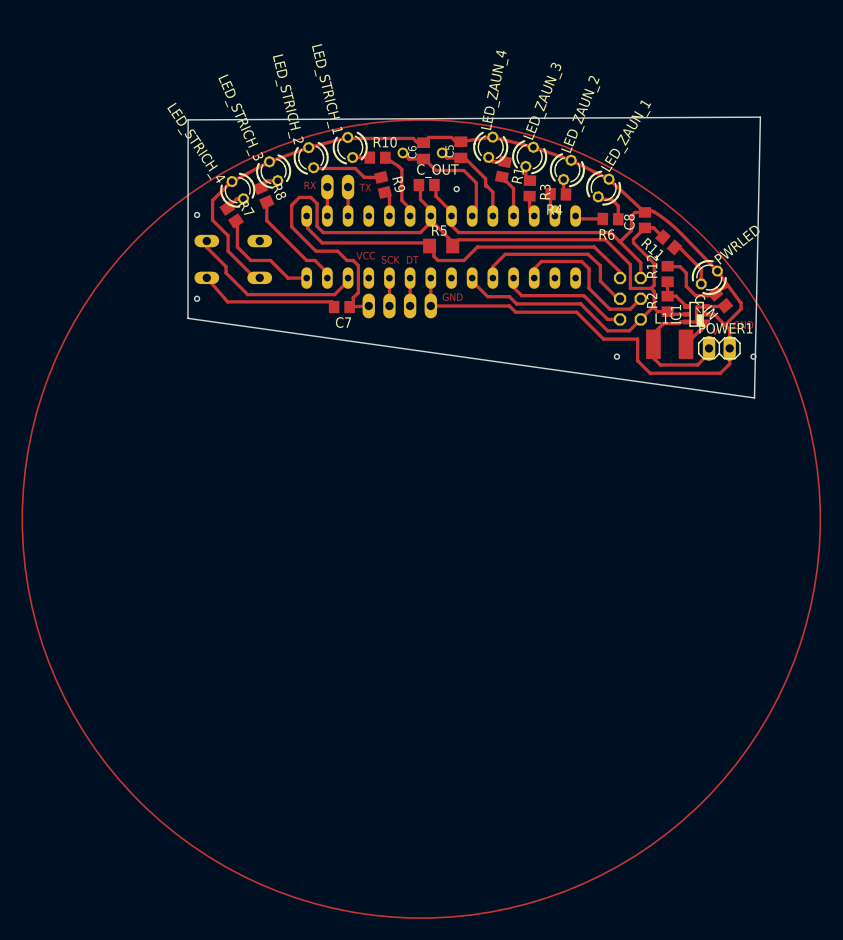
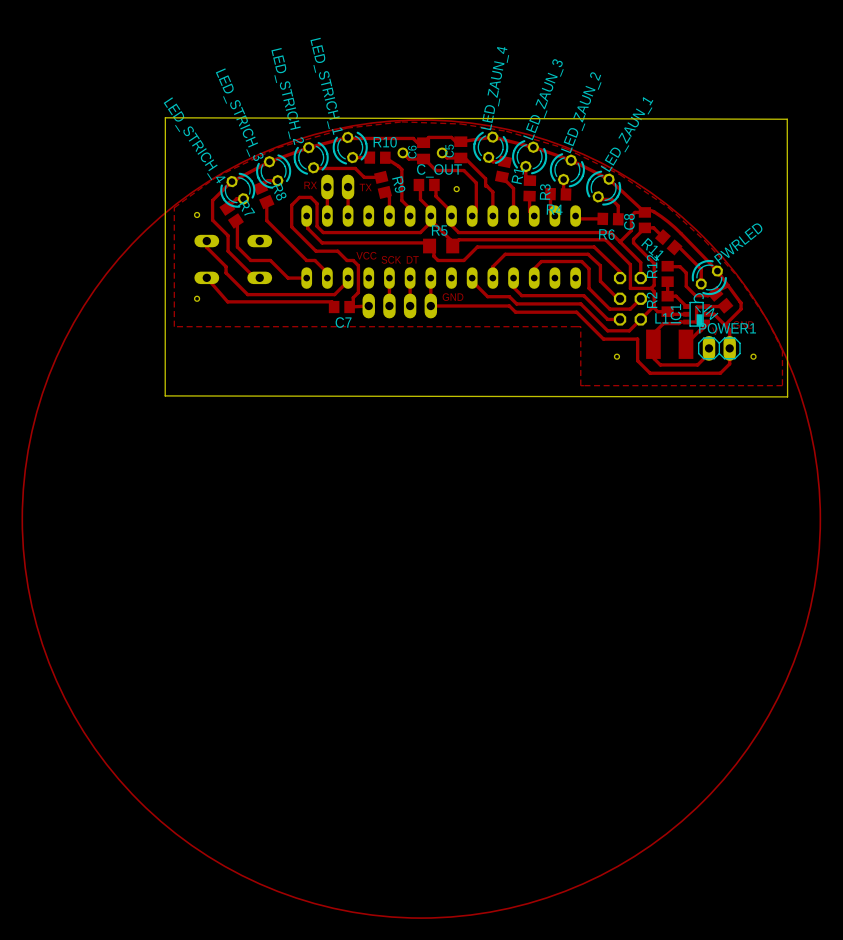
board edge: (760, 117) (188, 119) (187, 318) (754, 397) (760, 117) -> (165, 117) (165, 395) (787, 396) (787, 119) (165, 117)
top zone outline: none -> (401, 121) (347, 128) (277, 147) (216, 176) (174, 207) (174, 326) (580, 326) (580, 385) (782, 385) (782, 350) (766, 319) (739, 278) (704, 240) (668, 207) (620, 174) (566, 148) (506, 131) (460, 123) (401, 121)

